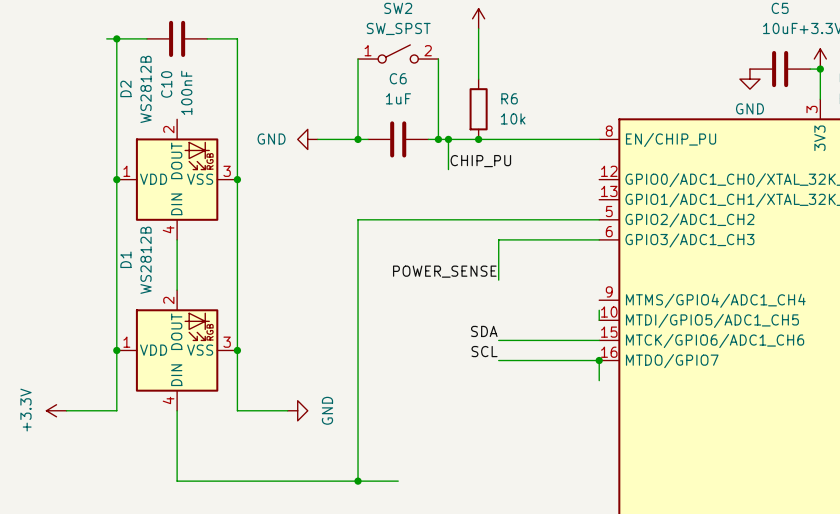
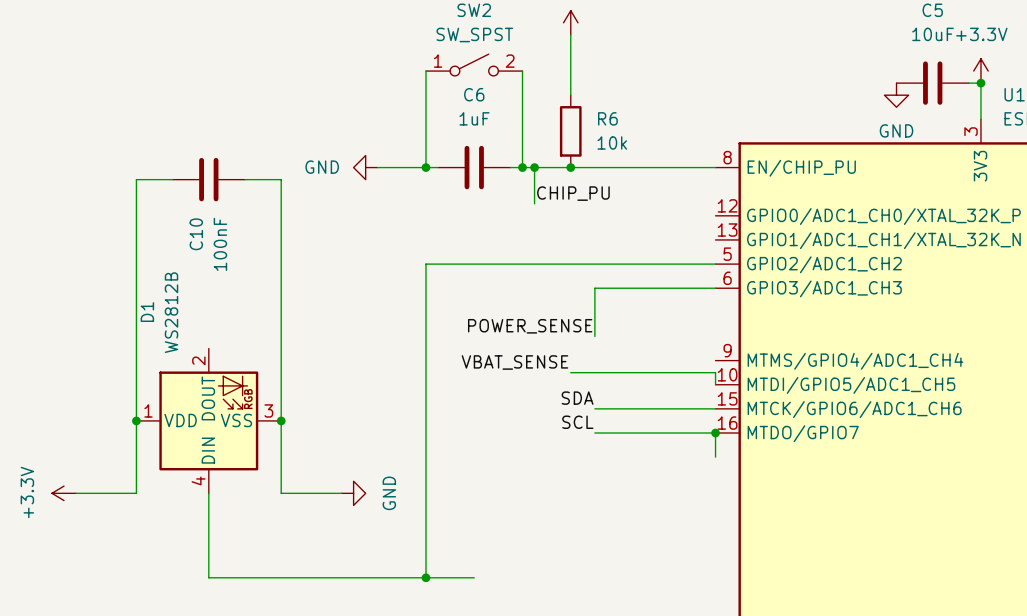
wire: (106, 38) (146, 38) -> none
wire: (116, 38) (116, 149) -> (172, 179) (136, 179)
junction: (116, 38) -> none
C10 position: (177, 38) -> (208, 179)
wire: (207, 38) (237, 38) (237, 149) -> (245, 179) (281, 179)
junction: (116, 179) -> none
D2: WS2812B (177, 179) -> none
junction: (237, 179) -> none
wire: (177, 239) (177, 290) -> none
label: none -> VBAT_SENSE (514, 362)
wire: none -> (570, 372) (715, 372)

